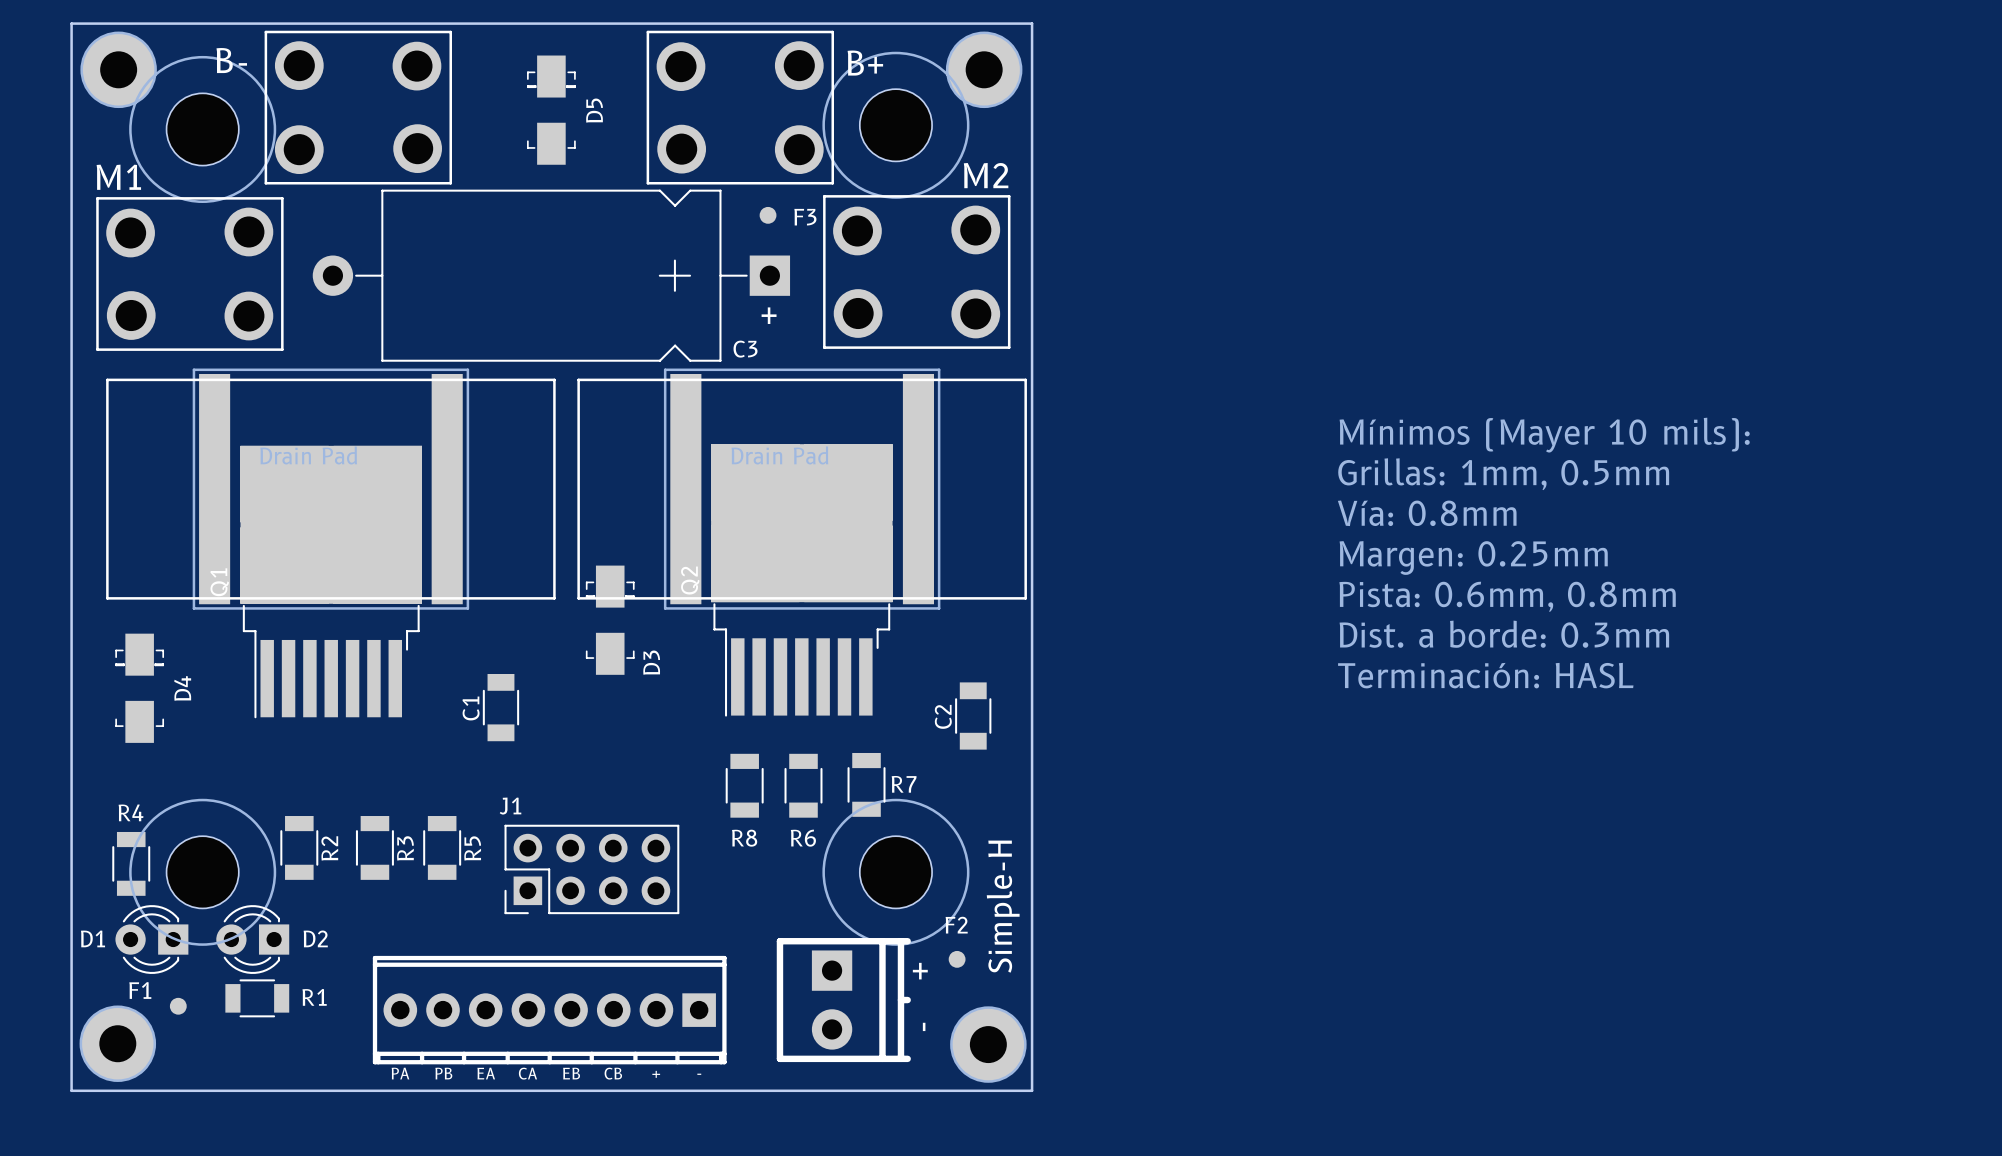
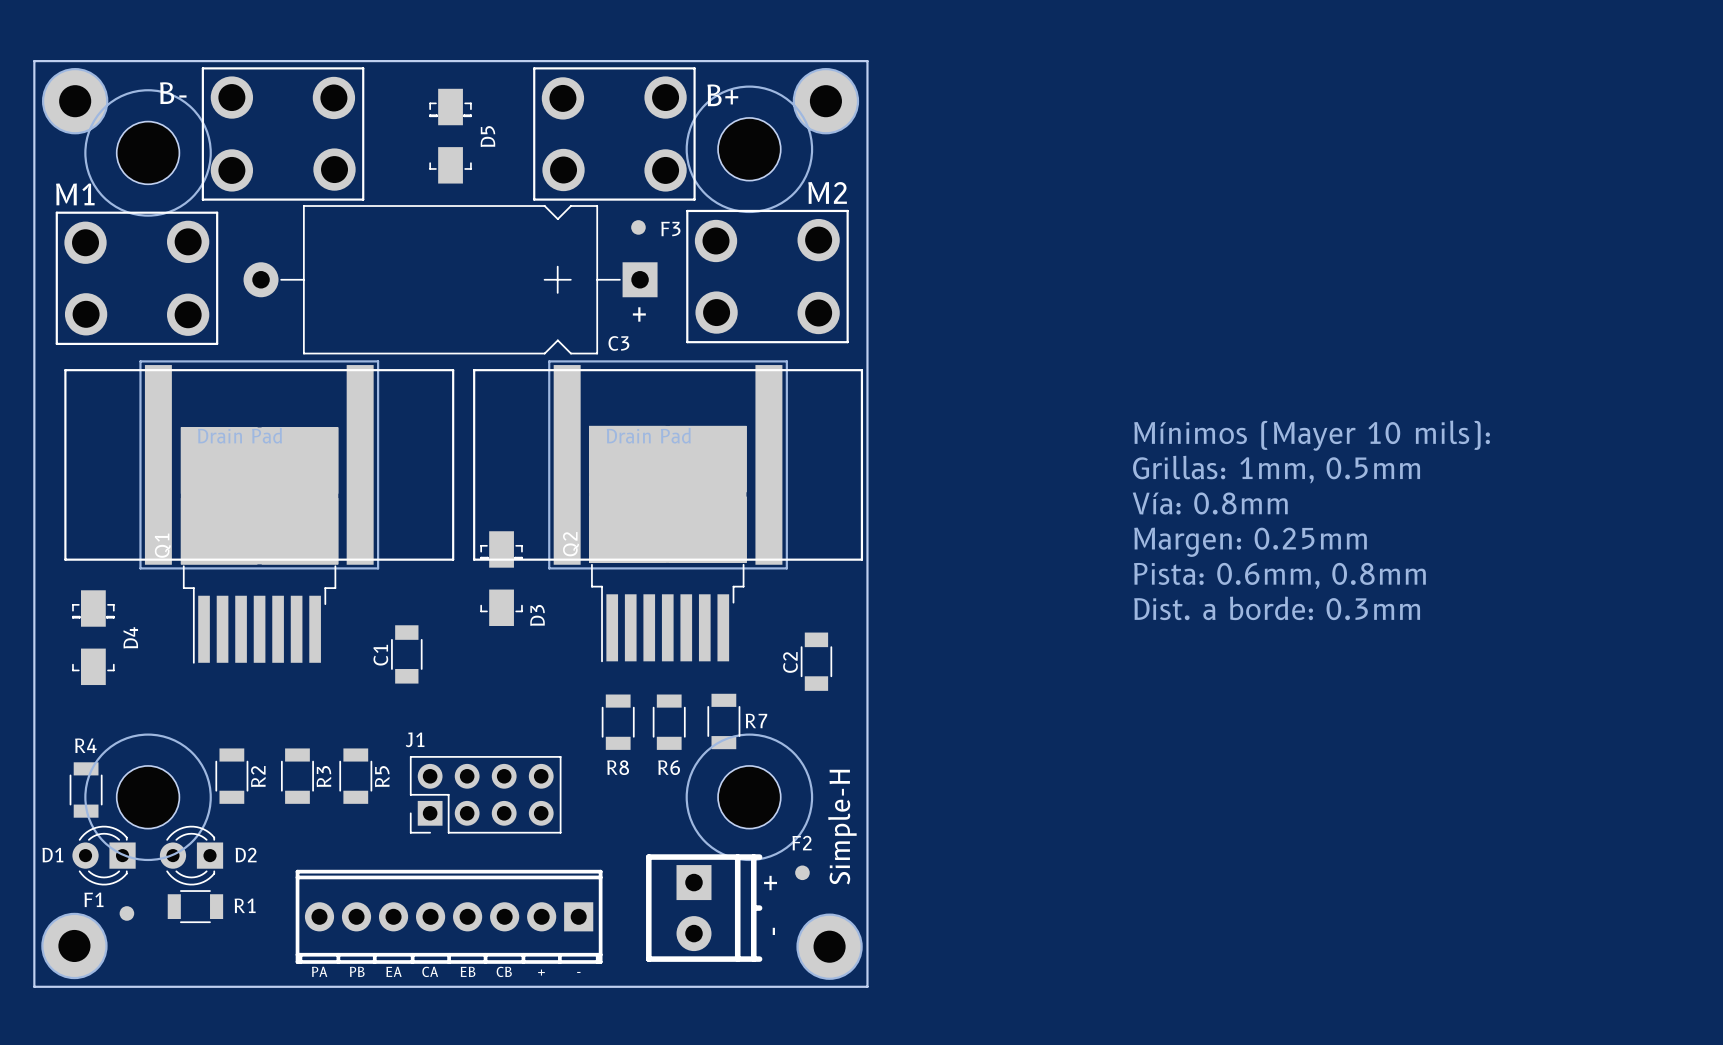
text position: Mínimos (Mayer 10 mils): (1544, 435) -> Mínimos (Mayer 10 mils): (1312, 435)
text position: Grillas: 1mm, 0.5mm (1503, 474) -> Grillas: 1mm, 0.5mm (1276, 469)
text position: Vía: 0.8mm (1427, 513) -> Vía: 0.8mm (1210, 503)
text position: Margen: 0.25mm (1473, 558) -> Margen: 0.25mm (1250, 542)
text position: Pista: 0.6mm, 0.8mm (1507, 596) -> Pista: 0.6mm, 0.8mm (1279, 575)
text position: Dist. a borde: 0.3mm (1504, 634) -> Dist. a borde: 0.3mm (1277, 608)
text: Terminación: HASL (1485, 675) -> none

